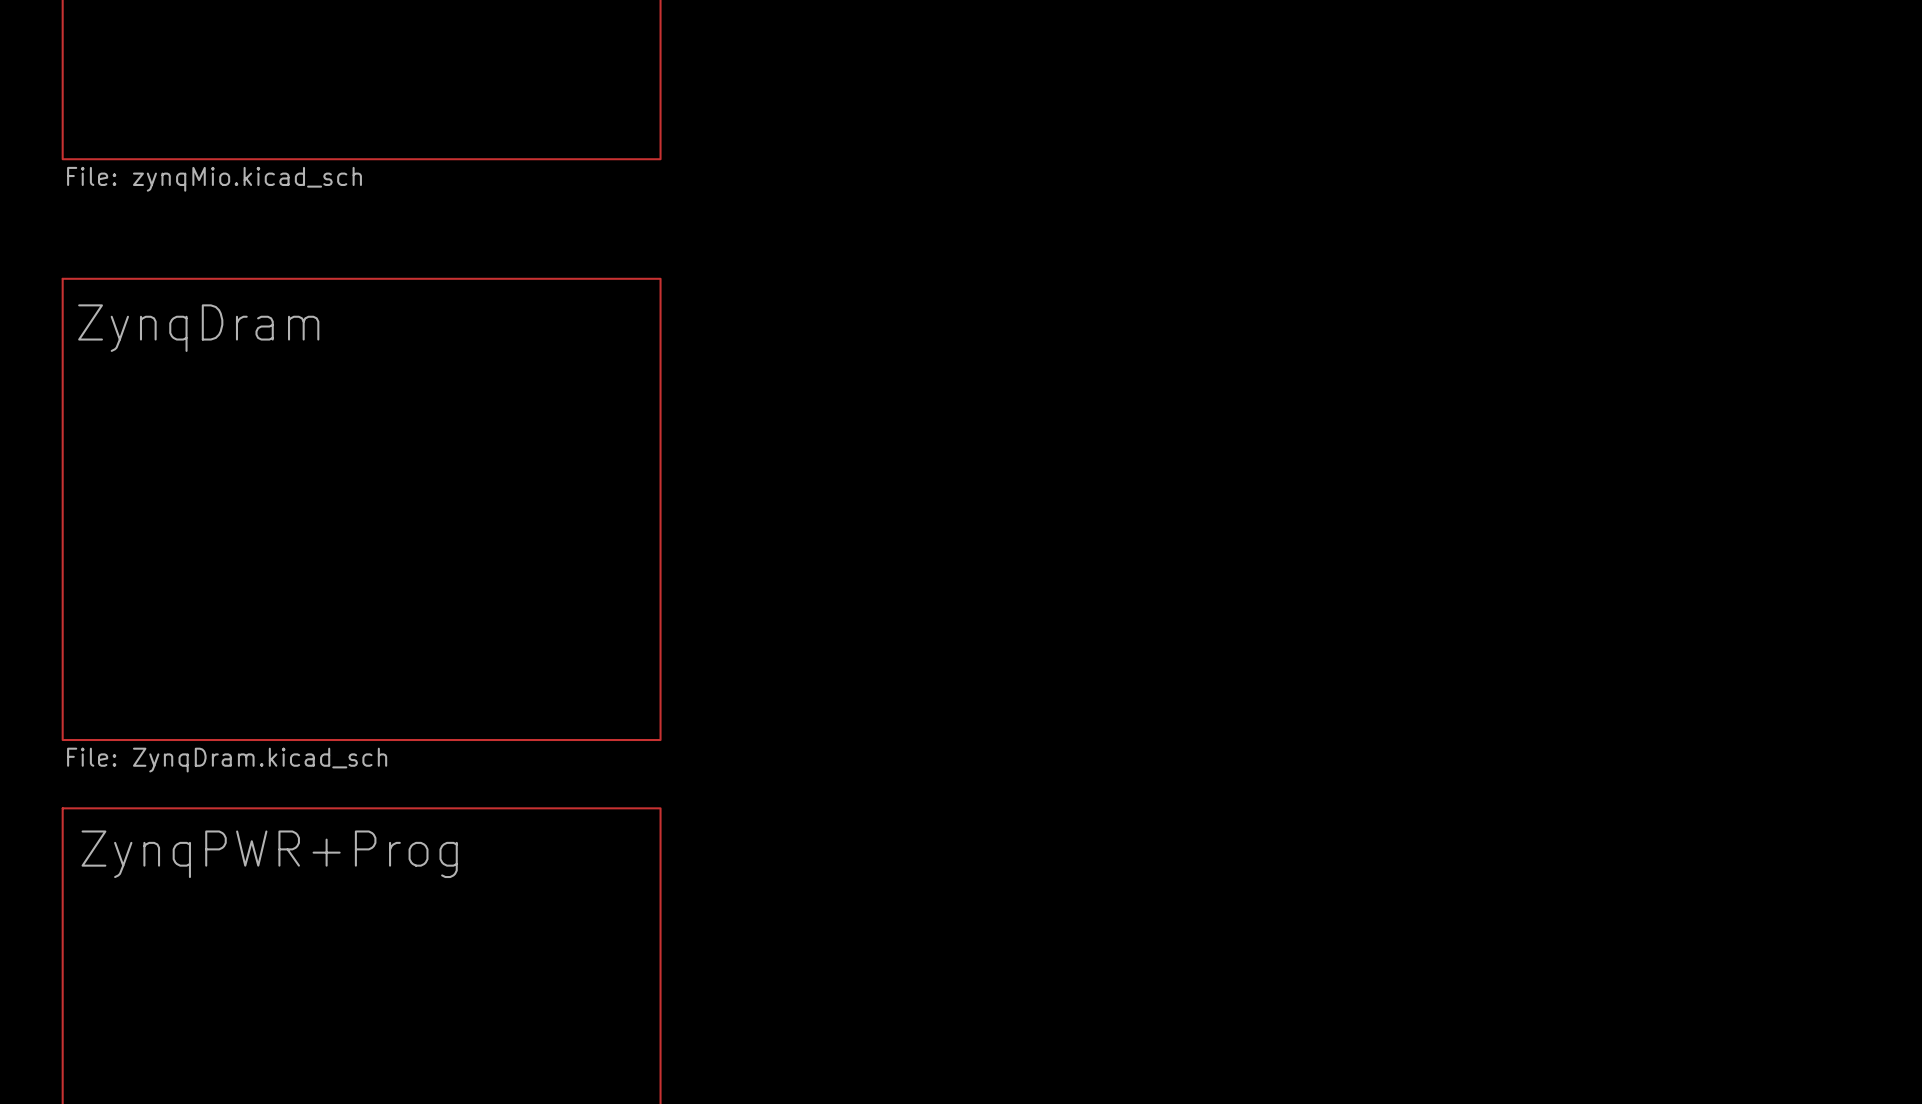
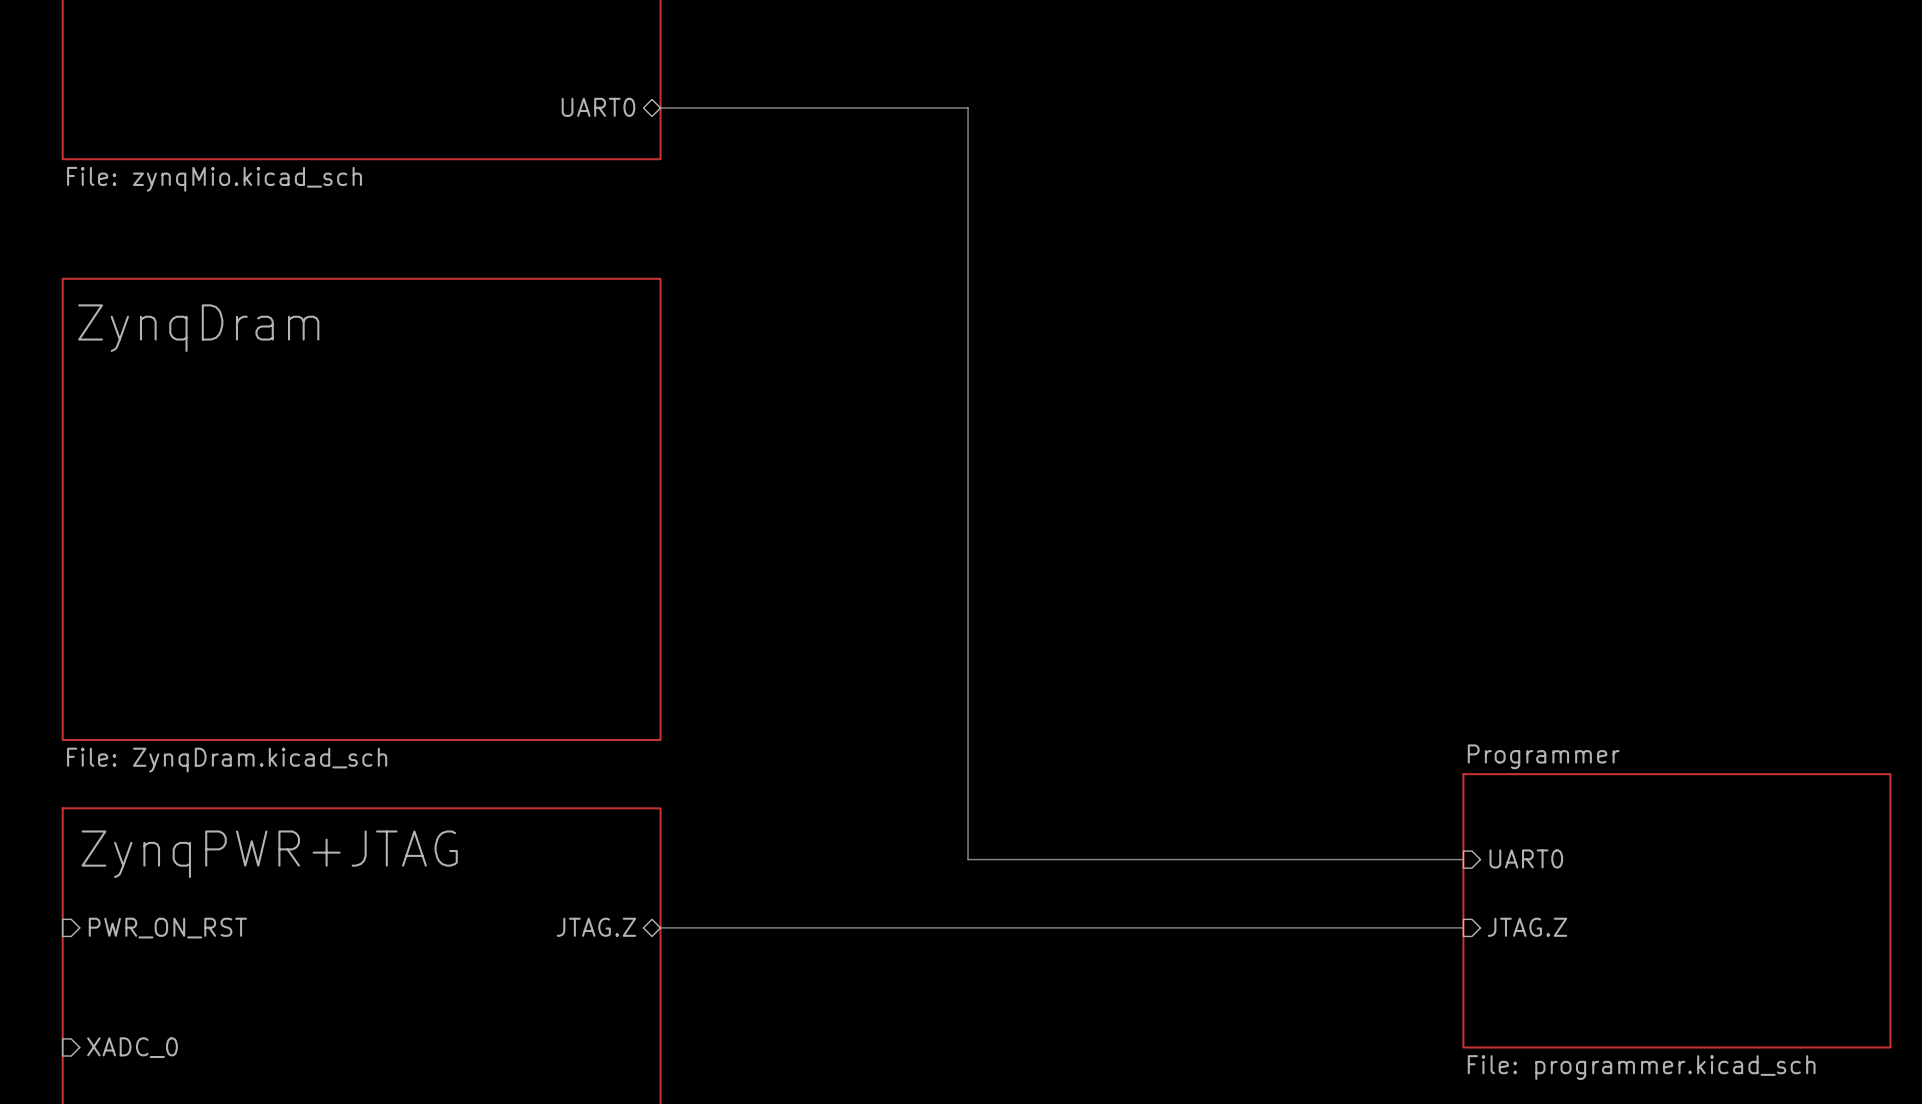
sheet pin: none -> UART0 (598, 107)
bus: none -> (660, 107) (968, 107) (968, 859) (1463, 859)
sheet ZynqPWR+Prog name: ZynqPWR+Prog (269, 854) -> ZynqPWR+JTAG (269, 854)
sheet pin: none -> UART0 (1526, 858)
sheet Programmer: none -> File: programmer.kicad_sch (1676, 910)
sheet pin: none -> JTAG.Z (596, 927)
bus: none -> (660, 927) (1463, 927)
sheet pin: none -> JTAG.Z (1527, 927)
sheet pin: none -> PWR_ON_RST (167, 928)
sheet pin: none -> XADC_0 (132, 1047)

